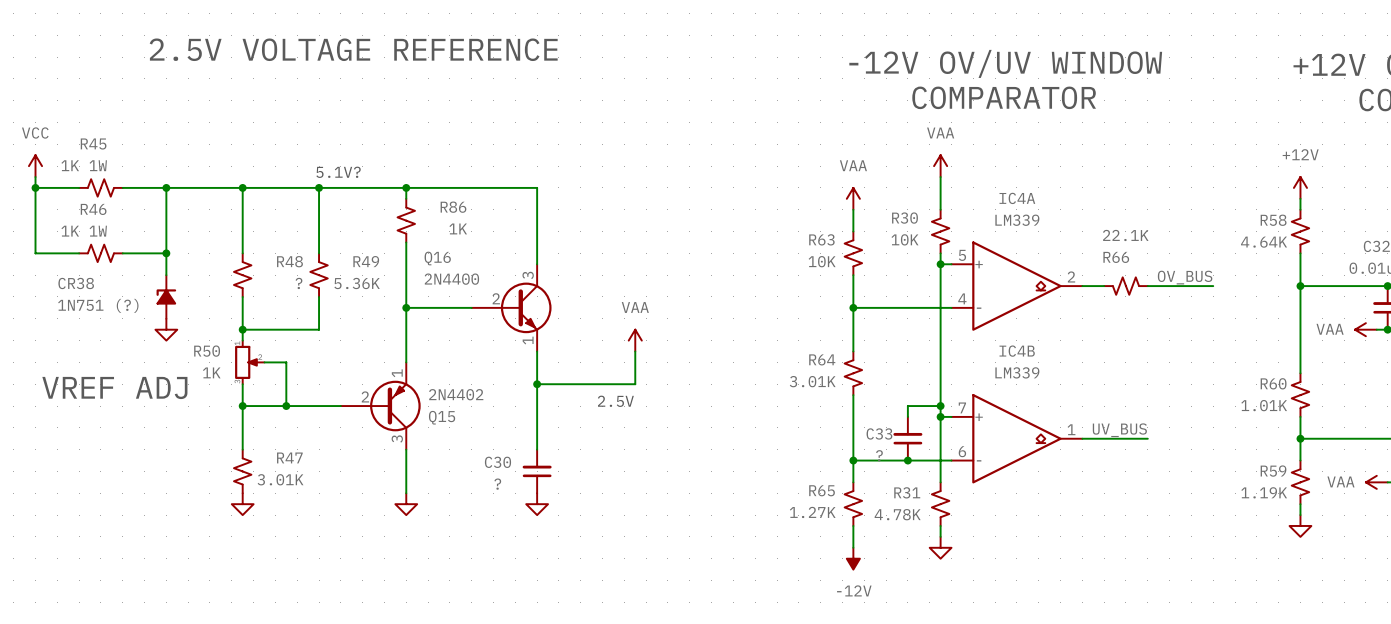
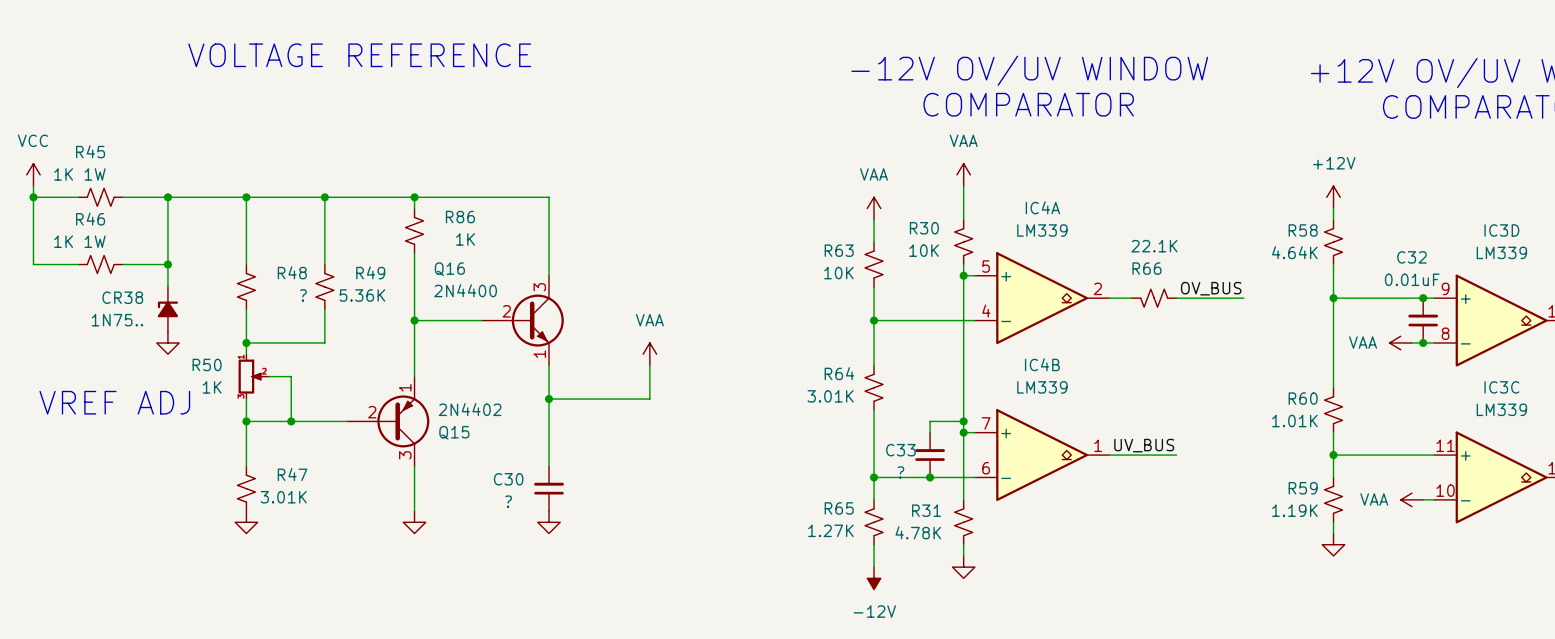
text: 2.5V VOLTAGE REFERENCE (353, 49) -> VOLTAGE REFERENCE (359, 55)
text: 5.1V? (338, 172) -> none
CR38 name position: CR38 (76, 283) -> CR38 (122, 297)
CR38 value: 1N751 (?) (98, 305) -> 1N75.. (117, 320)
text: 2.5V (615, 401) -> none

